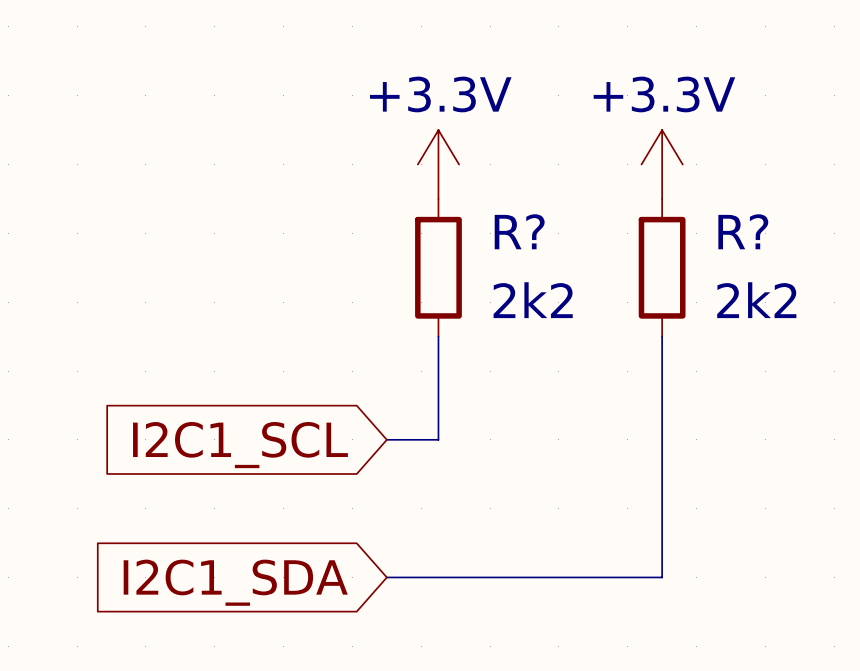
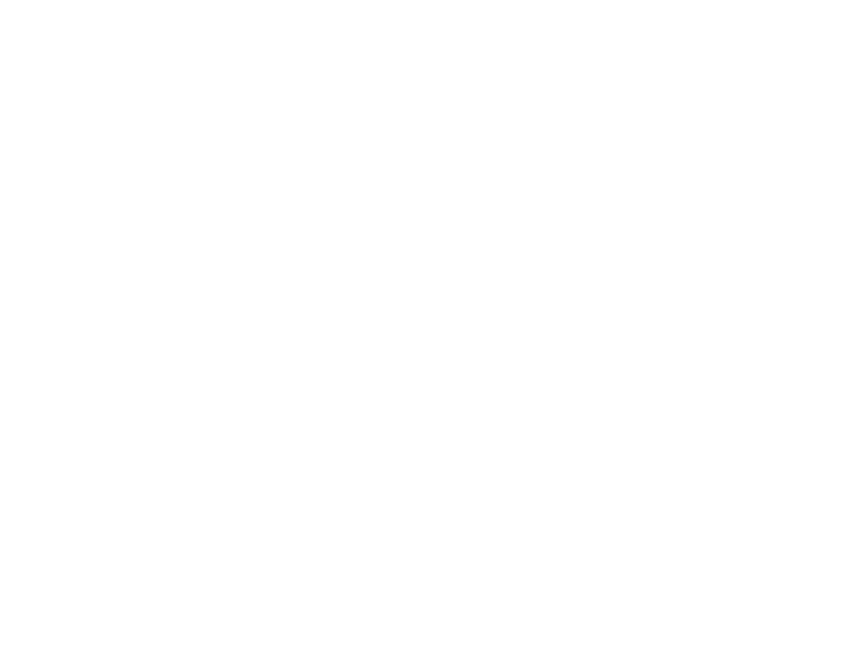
power symbol: +3.3V (438, 164) -> none
power symbol: +3.3V (662, 164) -> none
R?: 2k2 (438, 267) -> none
R?: 2k2 (662, 267) -> none
wire: (438, 336) (438, 439) (386, 439) -> none
wire: (662, 336) (662, 577) (386, 577) -> none
global label: I2C1_SCL (240, 445) -> none
global label: I2C1_SDA (235, 582) -> none

